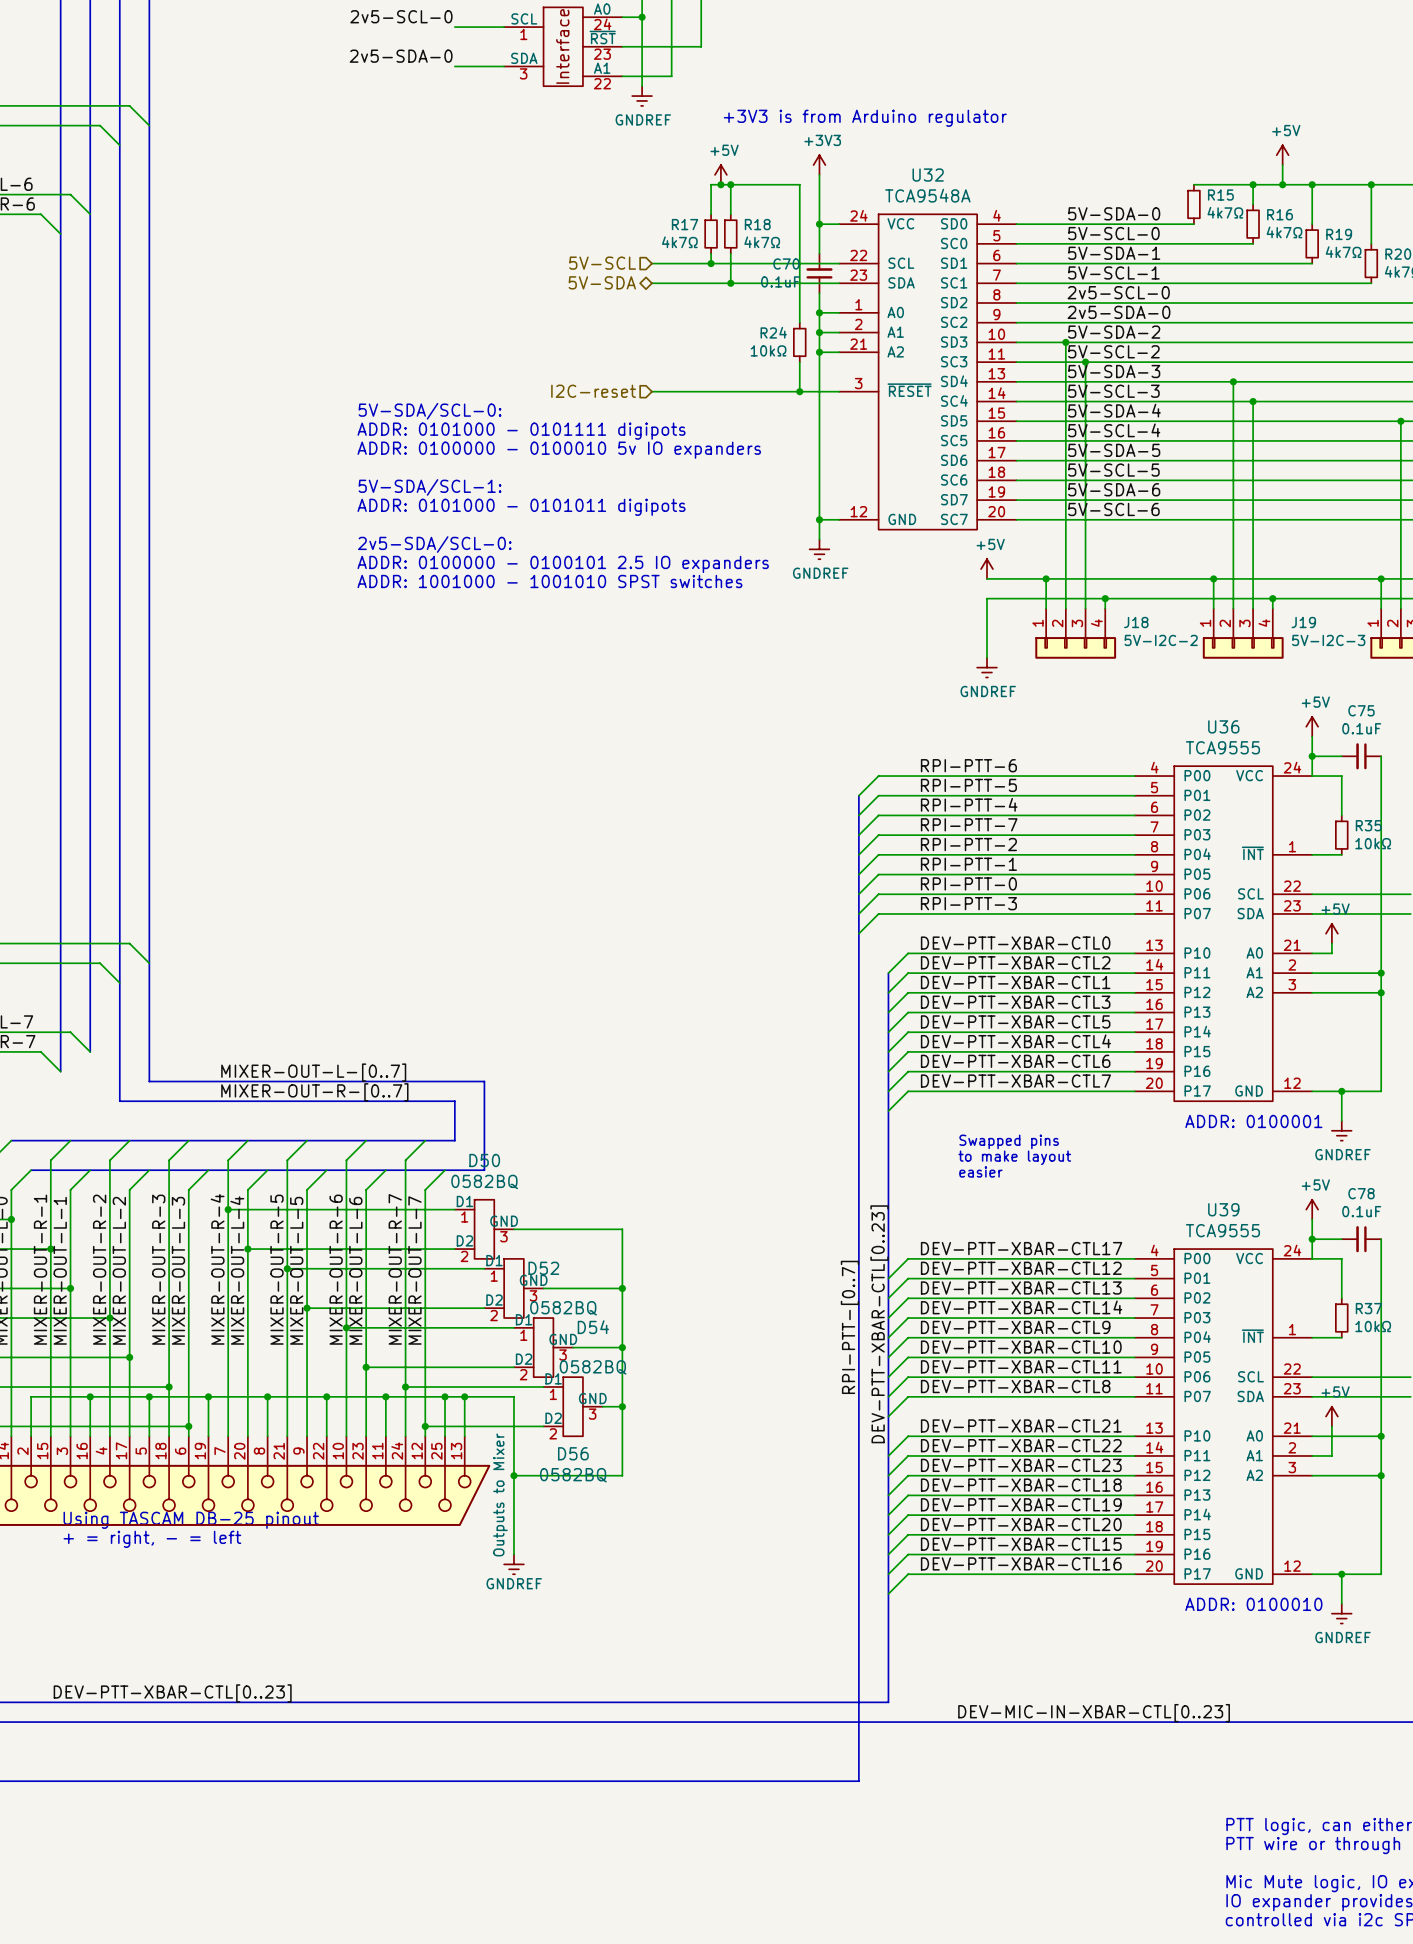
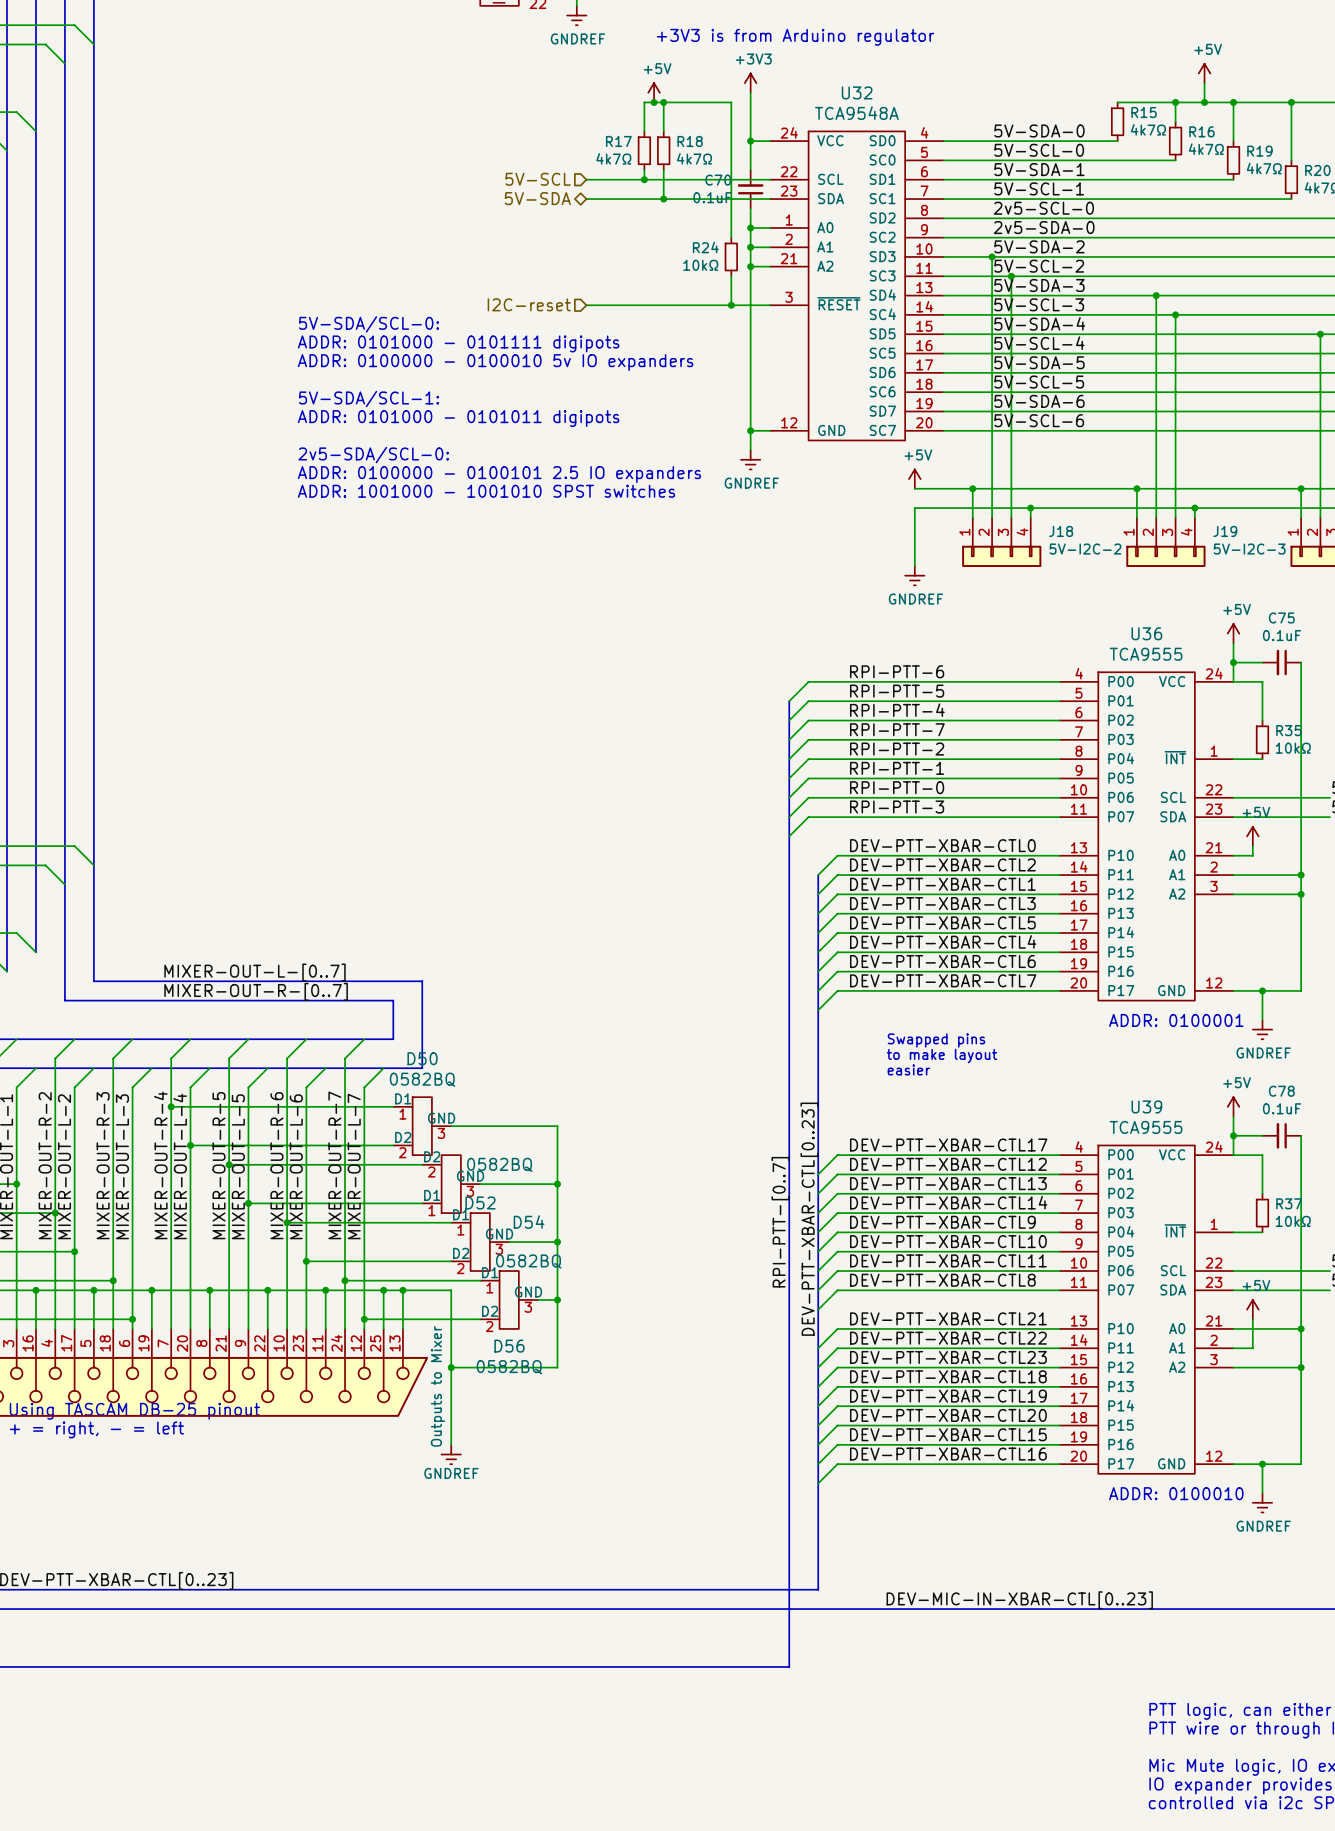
D52 flip: as is (513, 1288) -> up-down (451, 1184)

